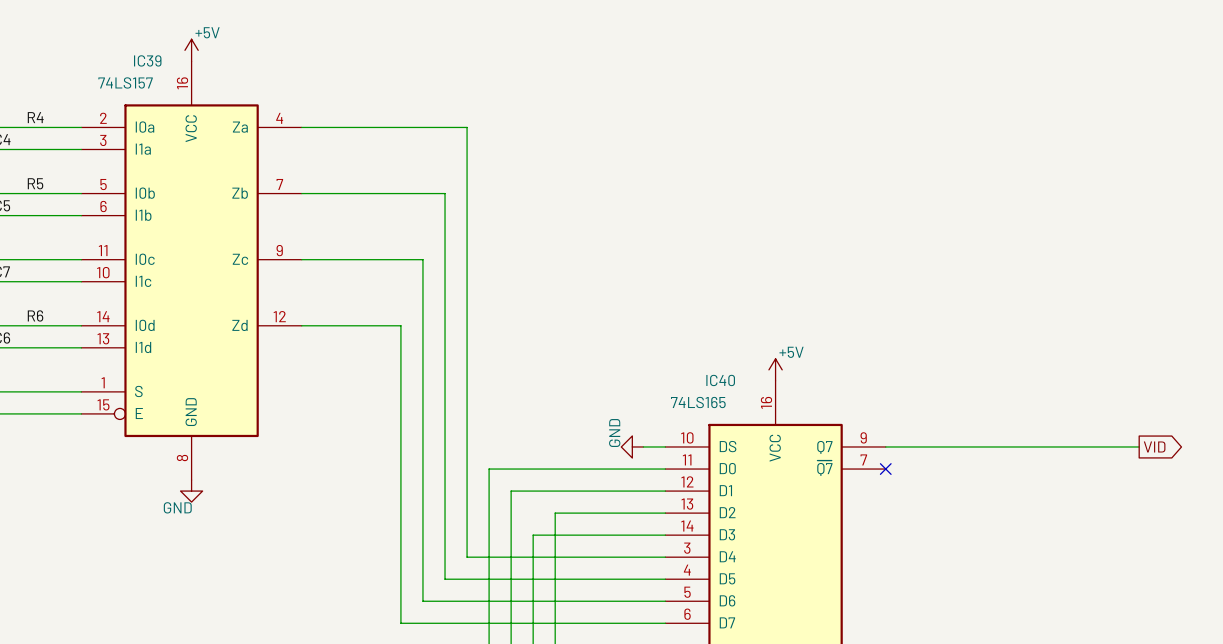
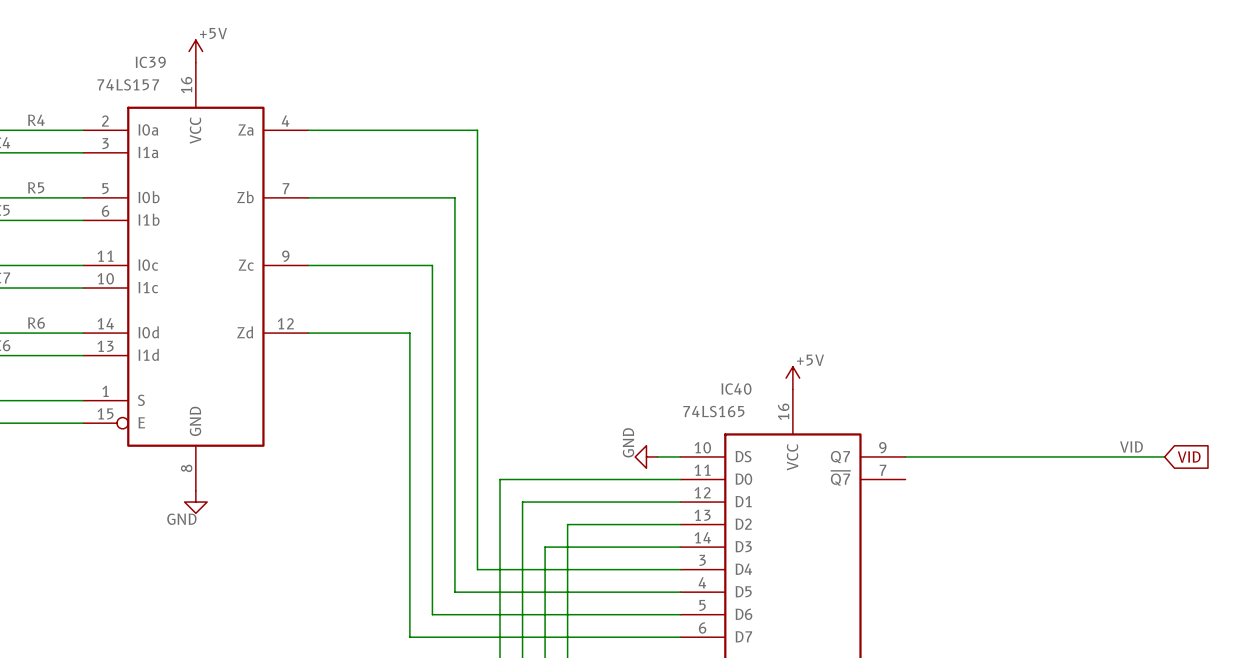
label: none -> VID (1131, 447)
global label shape: output (1154, 446) -> input (1189, 457)
no-connect mark: (885, 469) -> none

